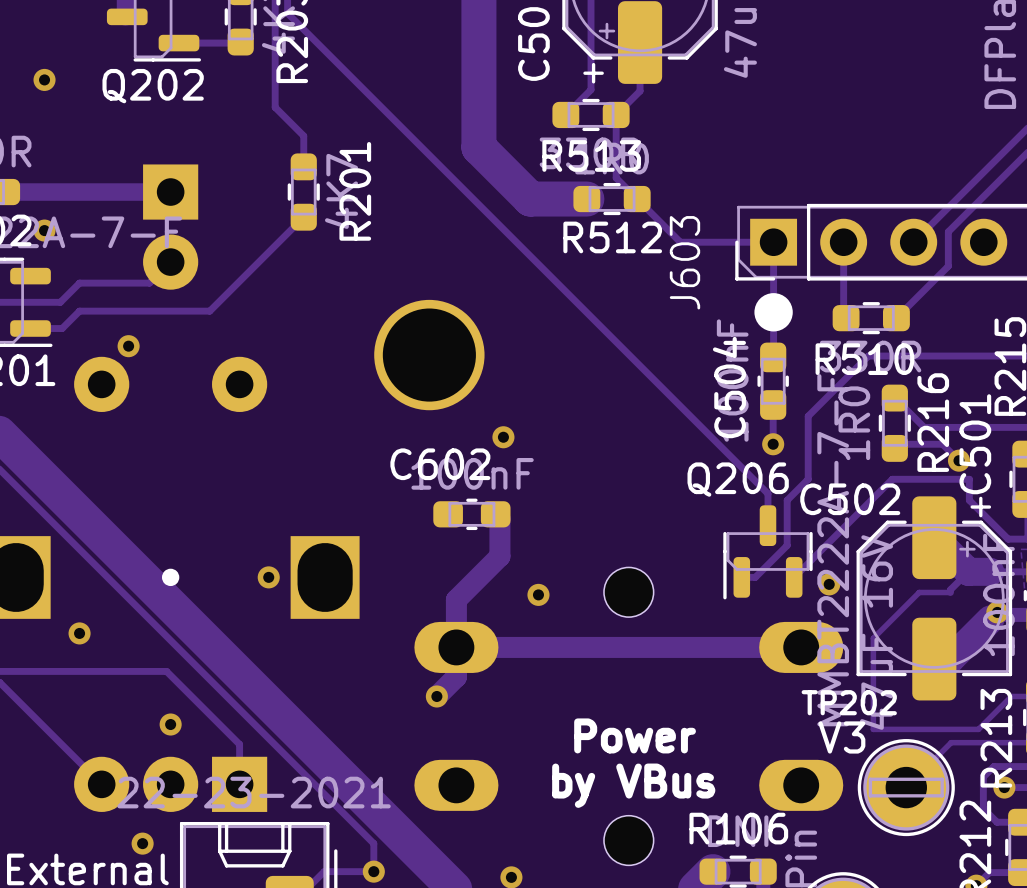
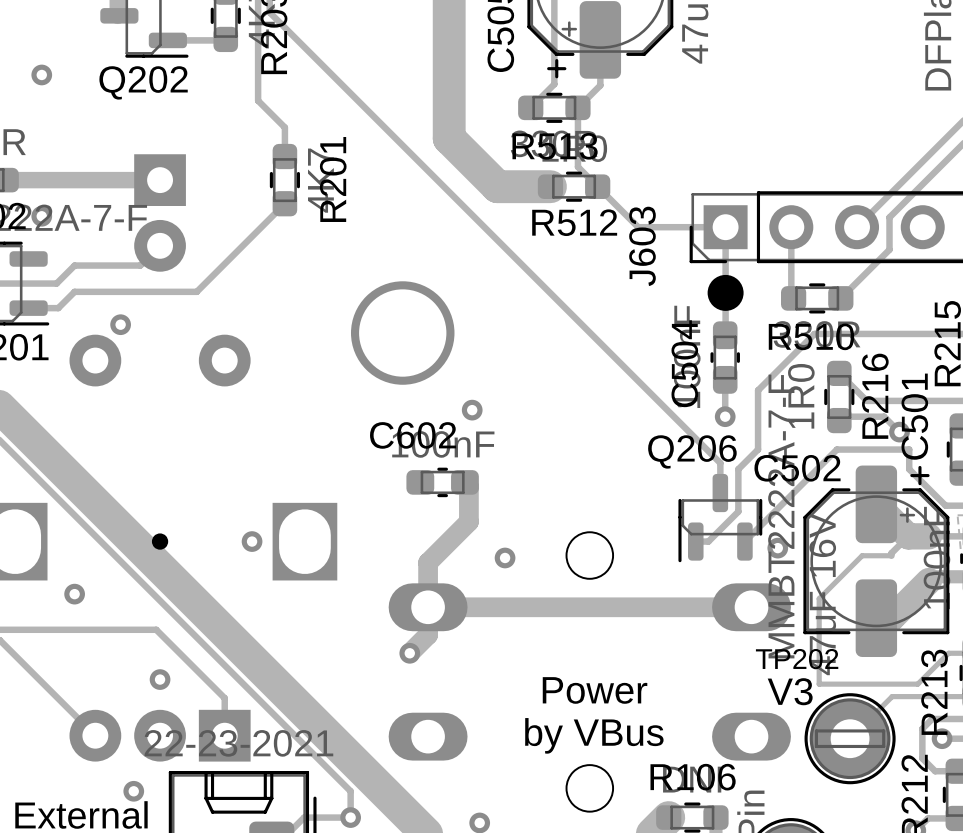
via: (997, 612) -> none

